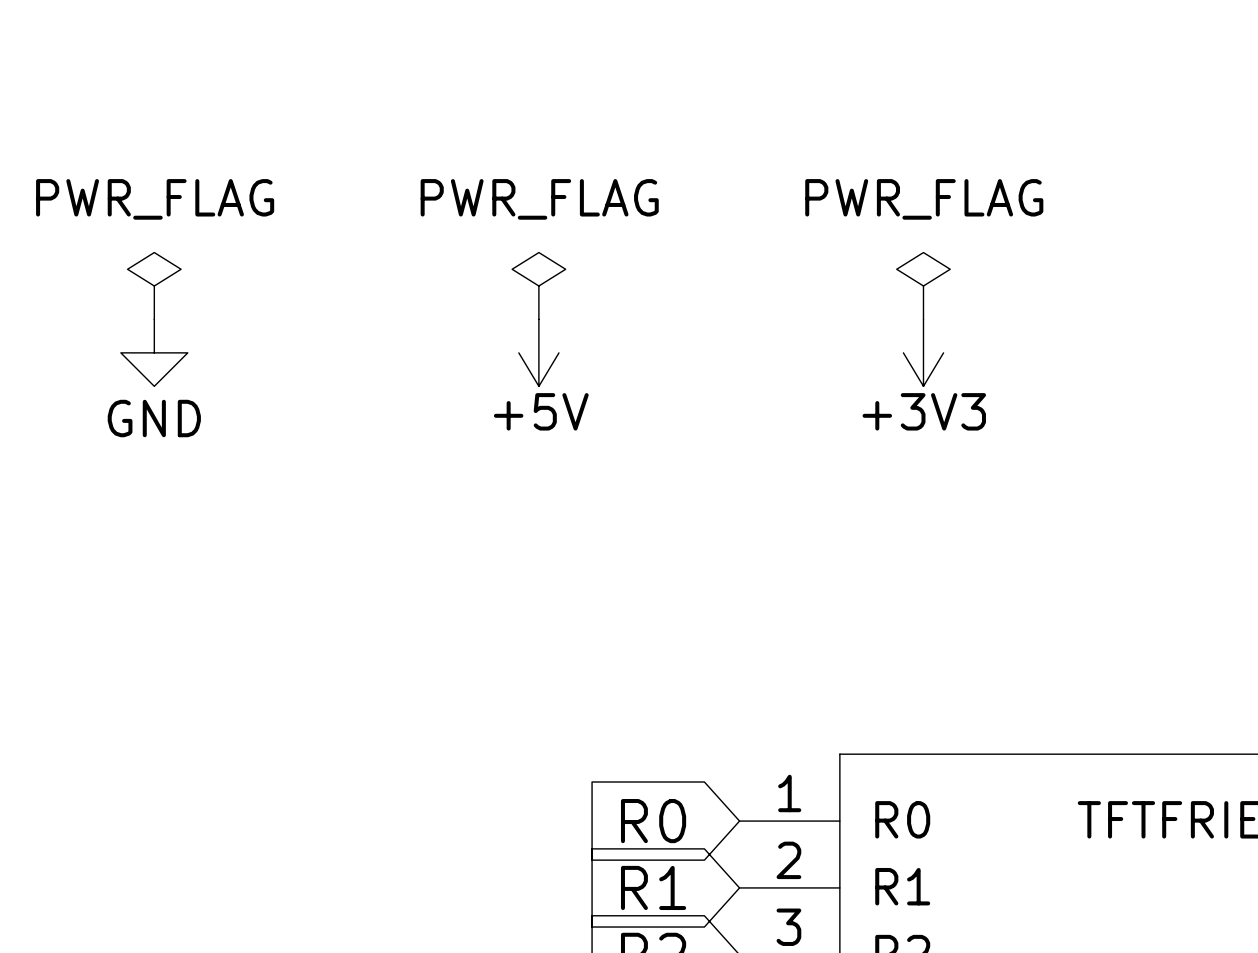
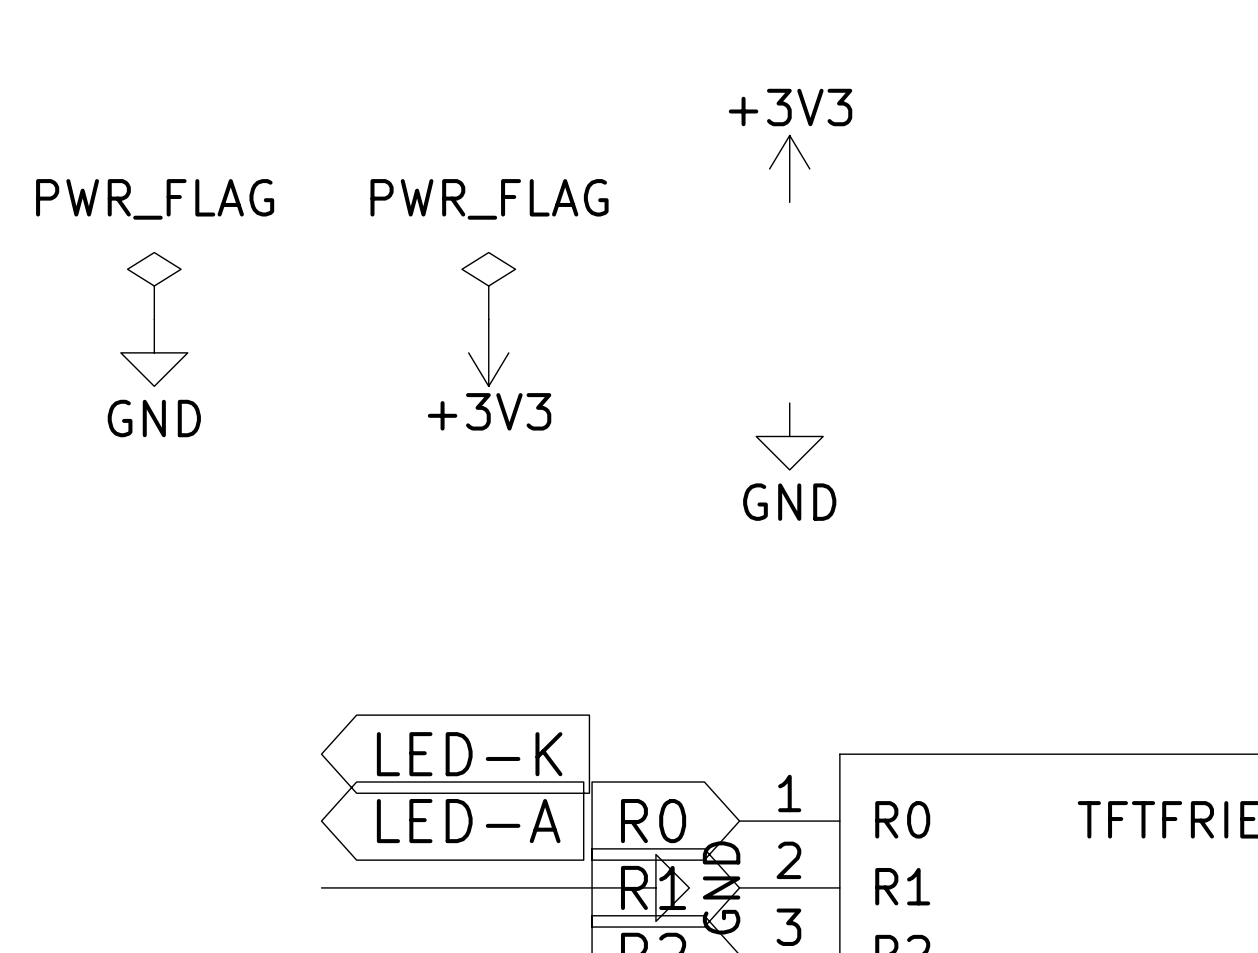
power symbol: none -> +3V3 (789, 168)
power symbol position: PWR_FLAG (538, 286) -> PWR_FLAG (488, 286)
power symbol: PWR_FLAG (923, 286) -> none
power symbol: none -> +3V3 (488, 352)
power symbol: +5V (538, 352) -> none
power symbol: +3V3 (923, 352) -> none
power symbol: none -> GND (789, 436)
global label: none -> LED-K (469, 754)
global label: none -> LED-A (468, 821)
wire: none -> (321, 887) (622, 887)
power symbol: none -> GND (655, 887)

